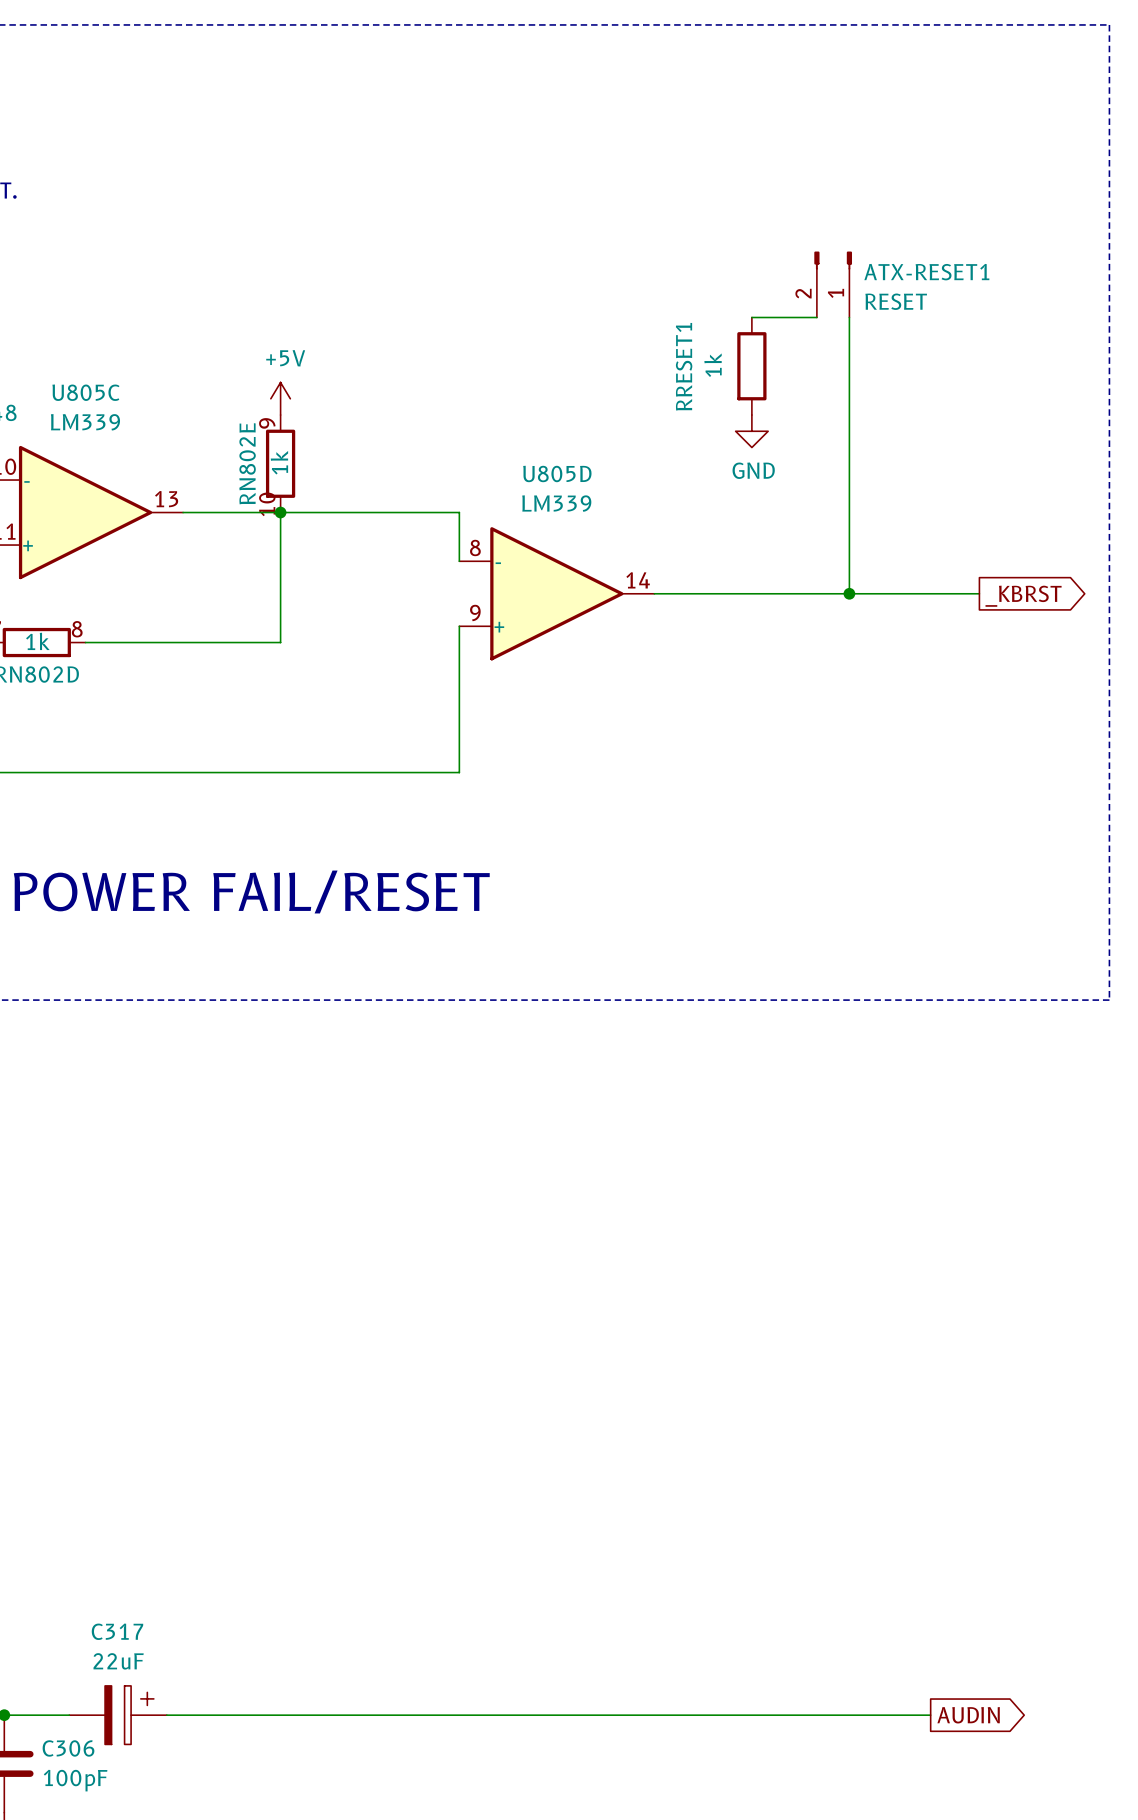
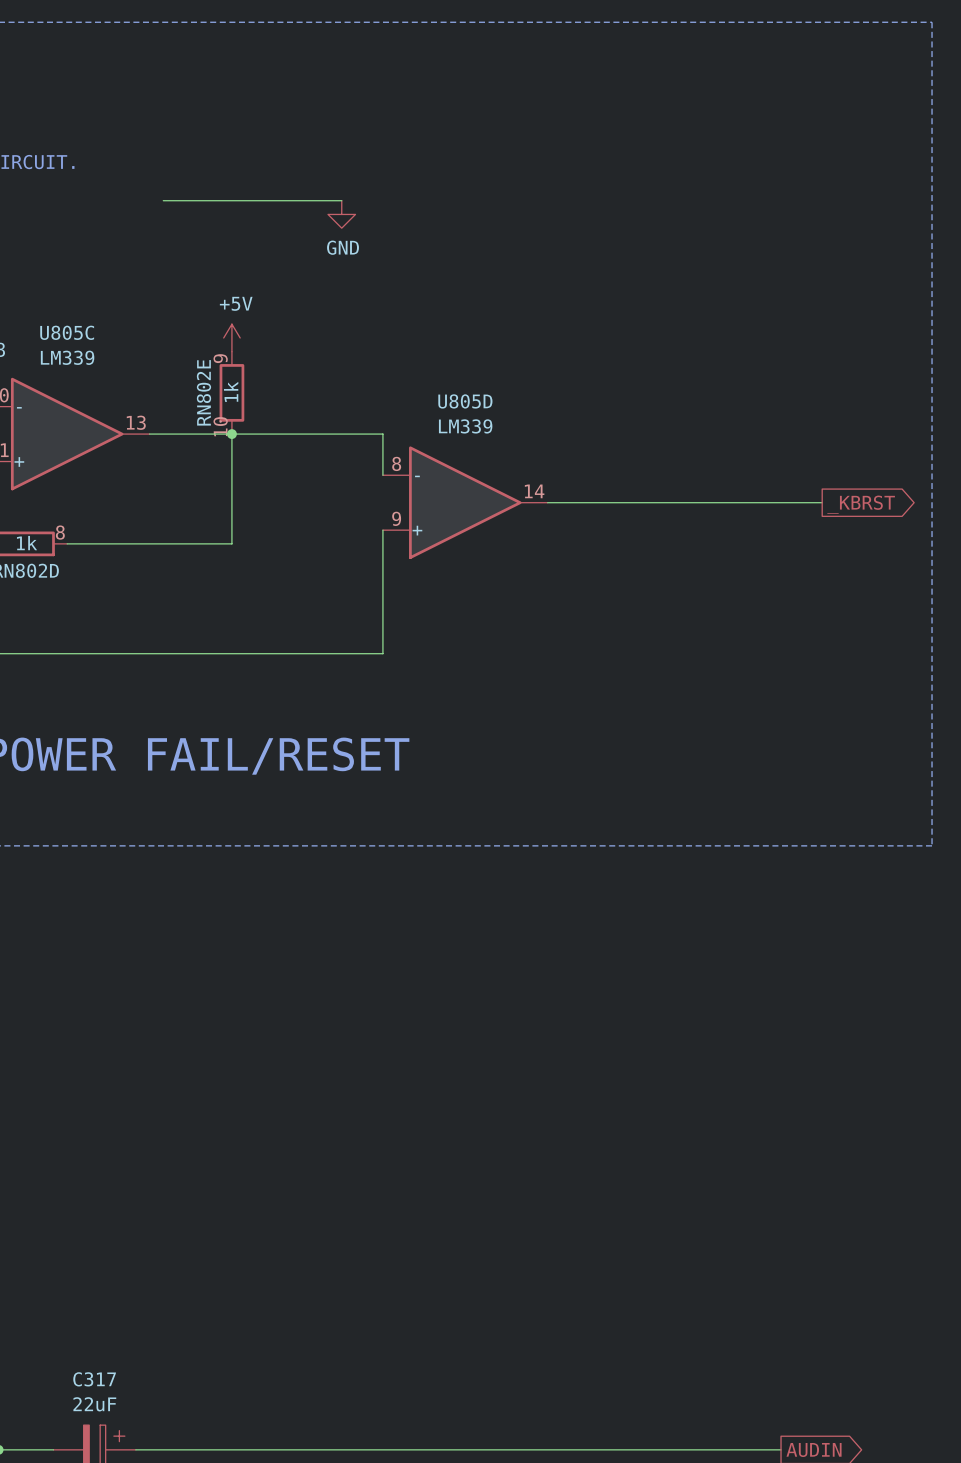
wire: none -> (163, 200) (341, 200)
power symbol: none -> GND (341, 214)
ATX-RESET1: RESET (833, 284) -> none
wire: (751, 317) (816, 317) -> none
wire: (849, 317) (849, 593) -> none
RRESET1: 1k (751, 366) -> none
power symbol: GND (751, 431) -> none
junction: (849, 593) -> none

